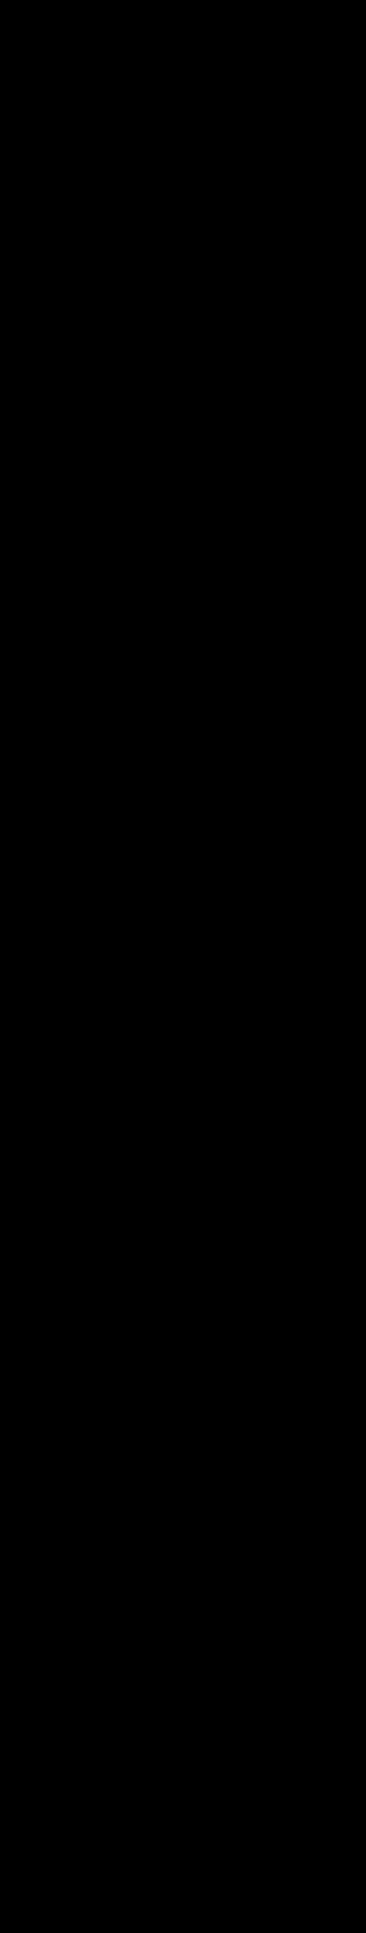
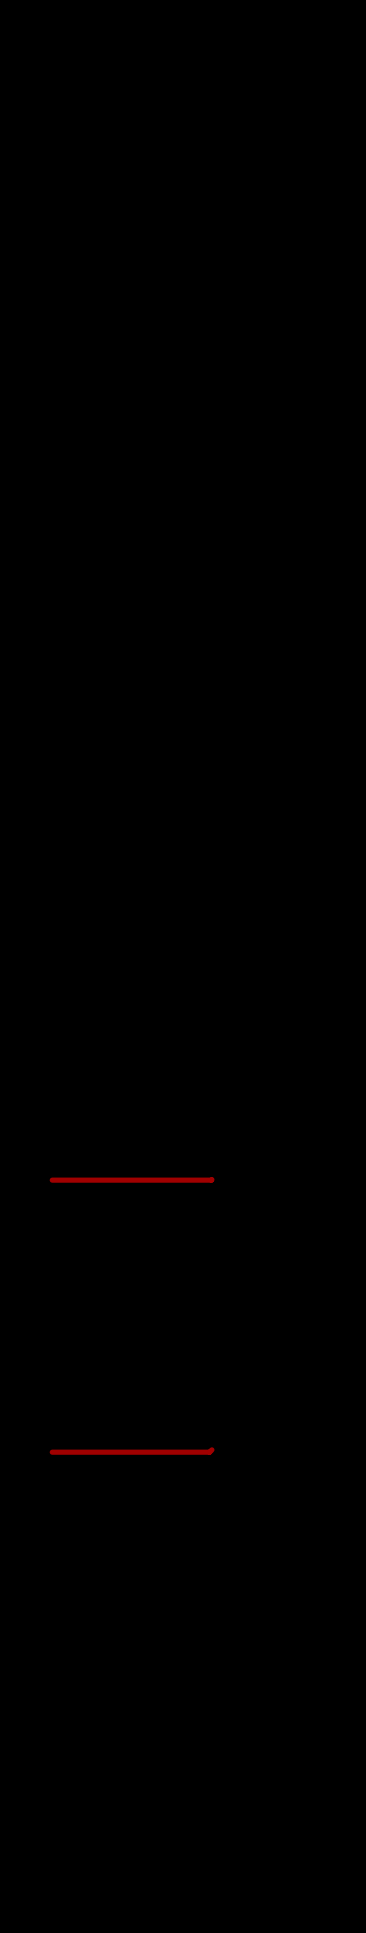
top track: none -> (211, 1179) (52, 1180)
top track: none -> (211, 1449) (209, 1452) (52, 1452)

